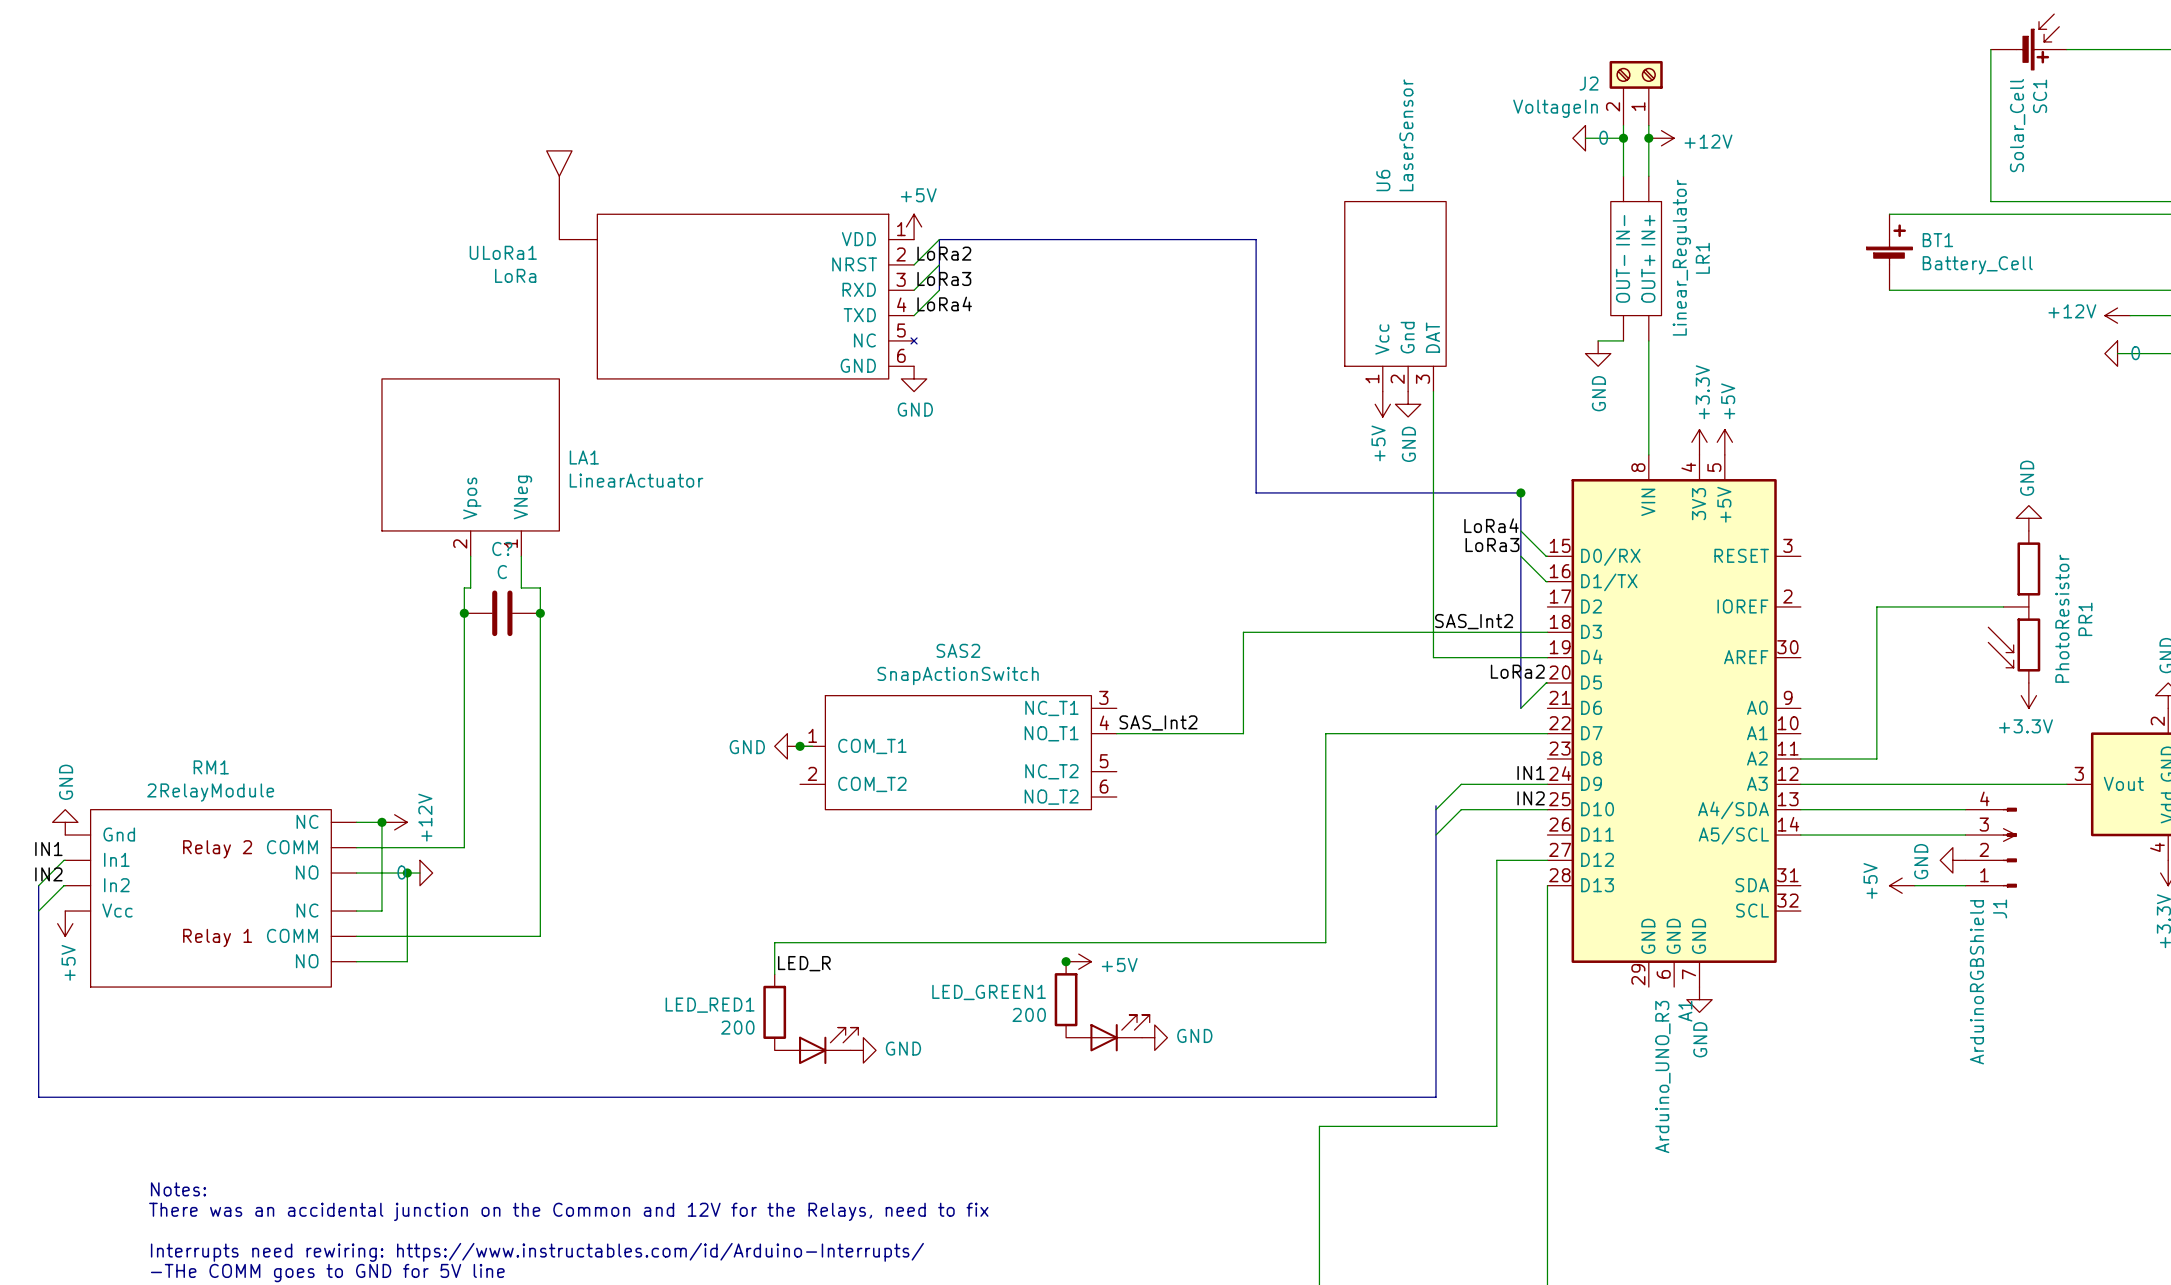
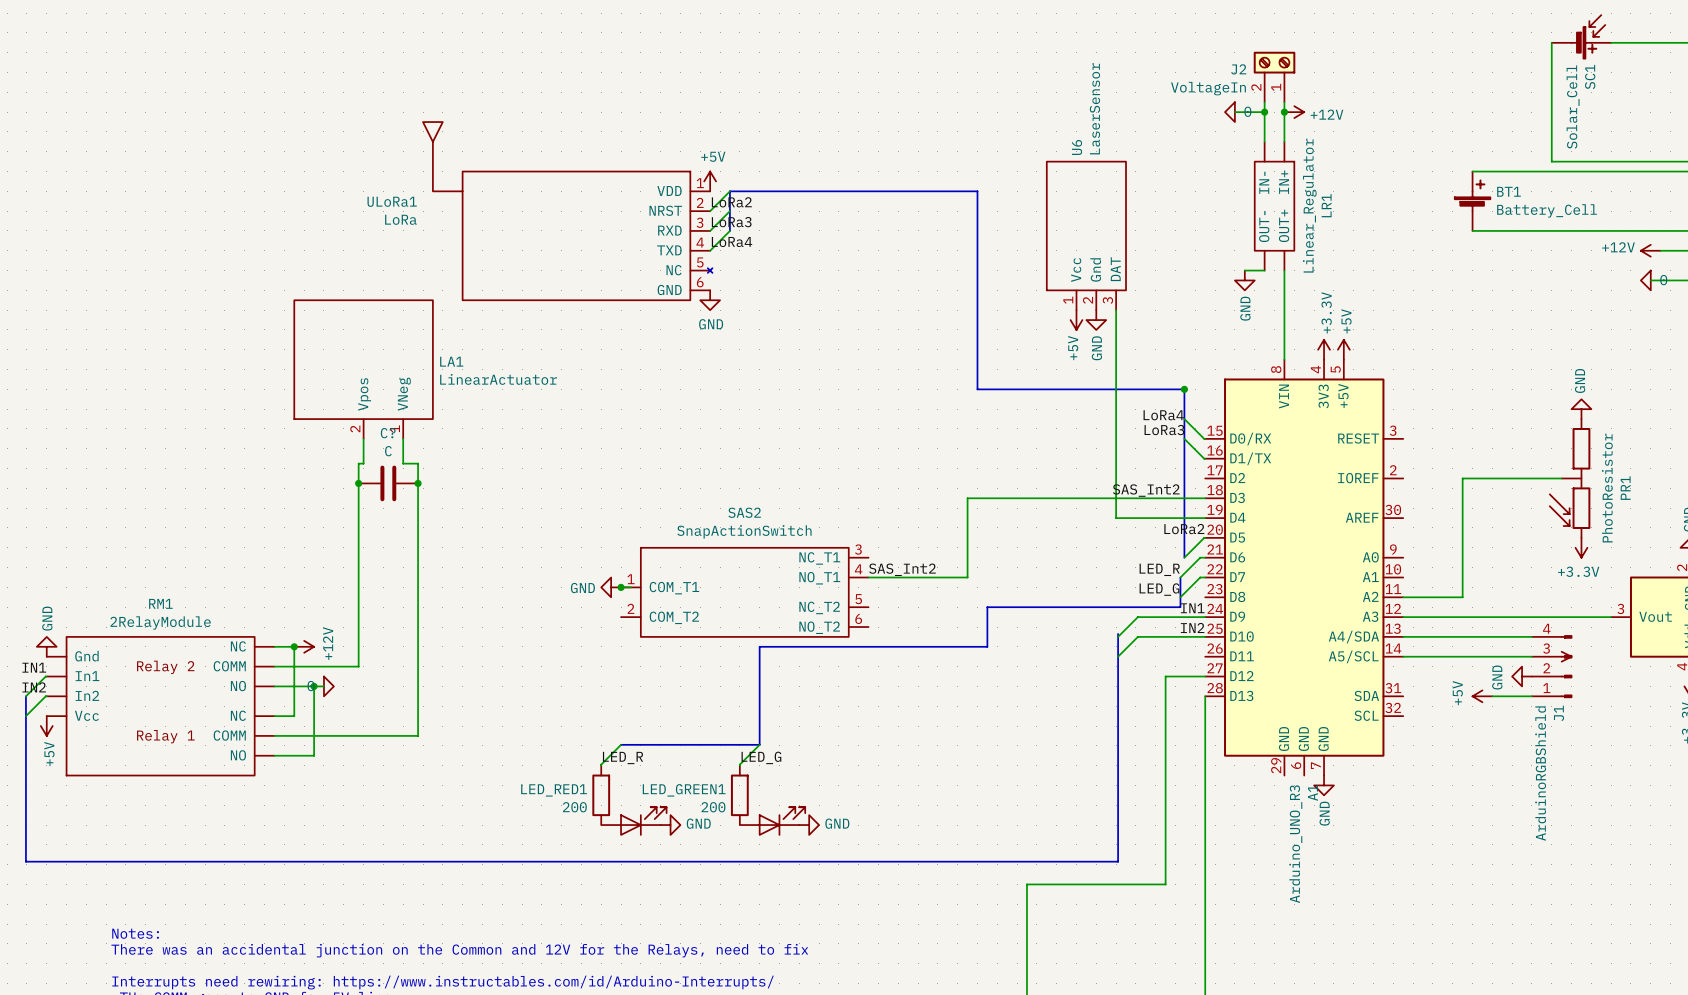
wire: none -> (1205, 557) (1200, 557) (1180, 577)
label: none -> LED_R (1159, 569)
bus: none -> (1180, 577) (1180, 607)
wire: (1541, 733) (1325, 733) (1325, 942) (774, 942) (774, 973) -> (1200, 577) (1180, 597)
label: none -> LED_G (1159, 589)
bus: none -> (1179, 607) (987, 607) (987, 646) (759, 646) (759, 744) (621, 744)
wire: none -> (621, 744) (601, 764)
wire: none -> (759, 744) (739, 765)
junction: (1066, 961) -> none
power symbol: +5V (1078, 961) -> none
label: none -> LED_G (761, 757)
LED_GREEN1 position: (1102, 1006) -> (768, 800)
power symbol position: GND (1154, 1037) -> GND (809, 825)

